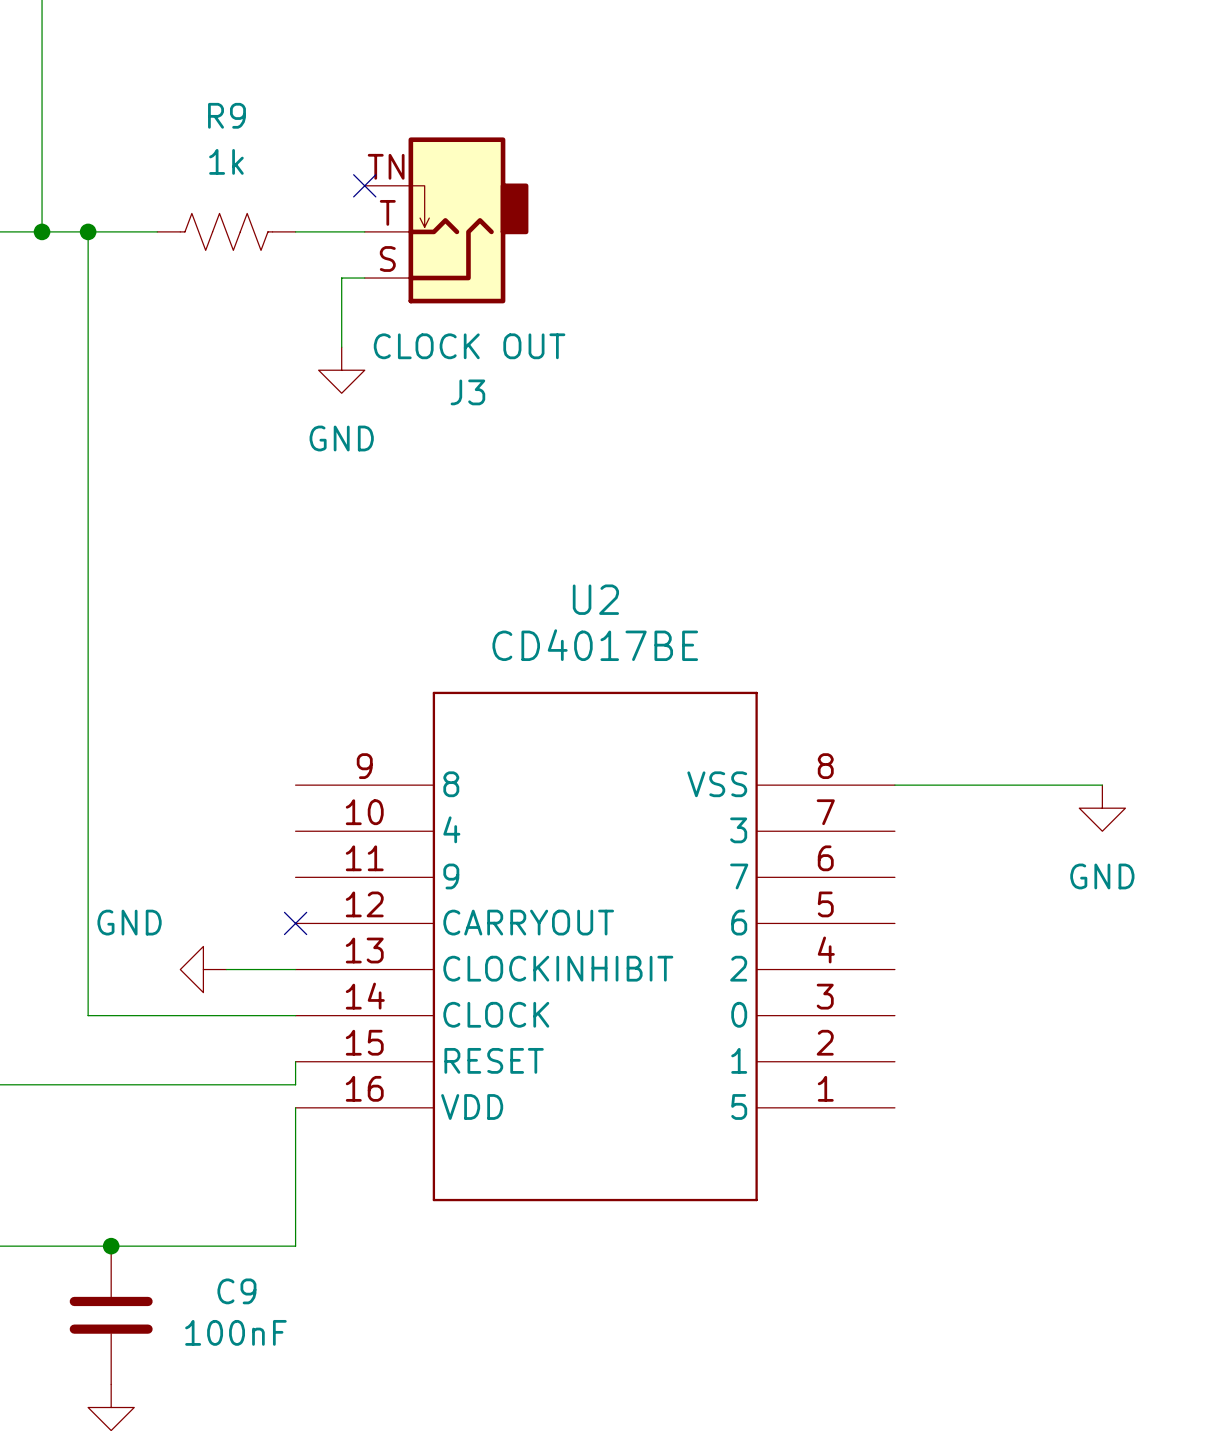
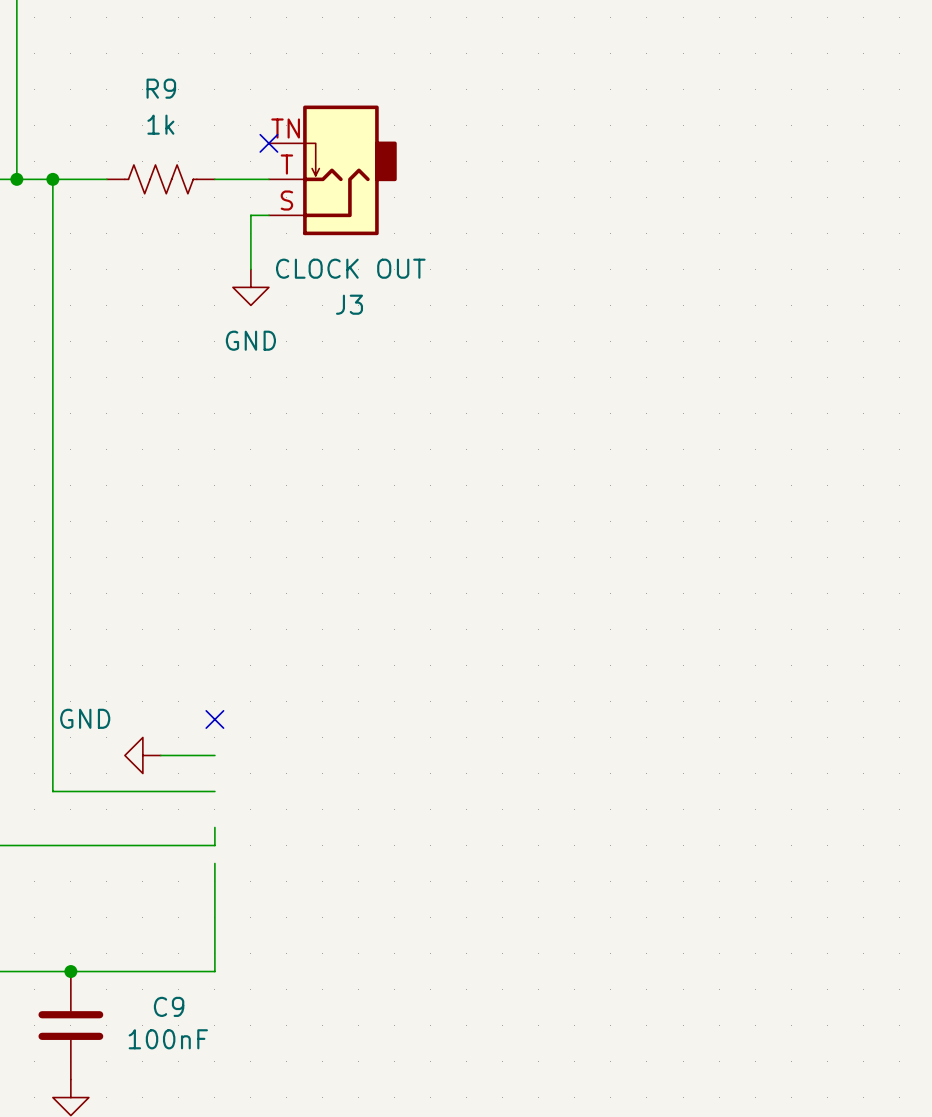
wire: (894, 785) (1102, 785) -> none
power symbol: GND (1102, 808) -> none
U2: CD4017BE (595, 946) -> none

